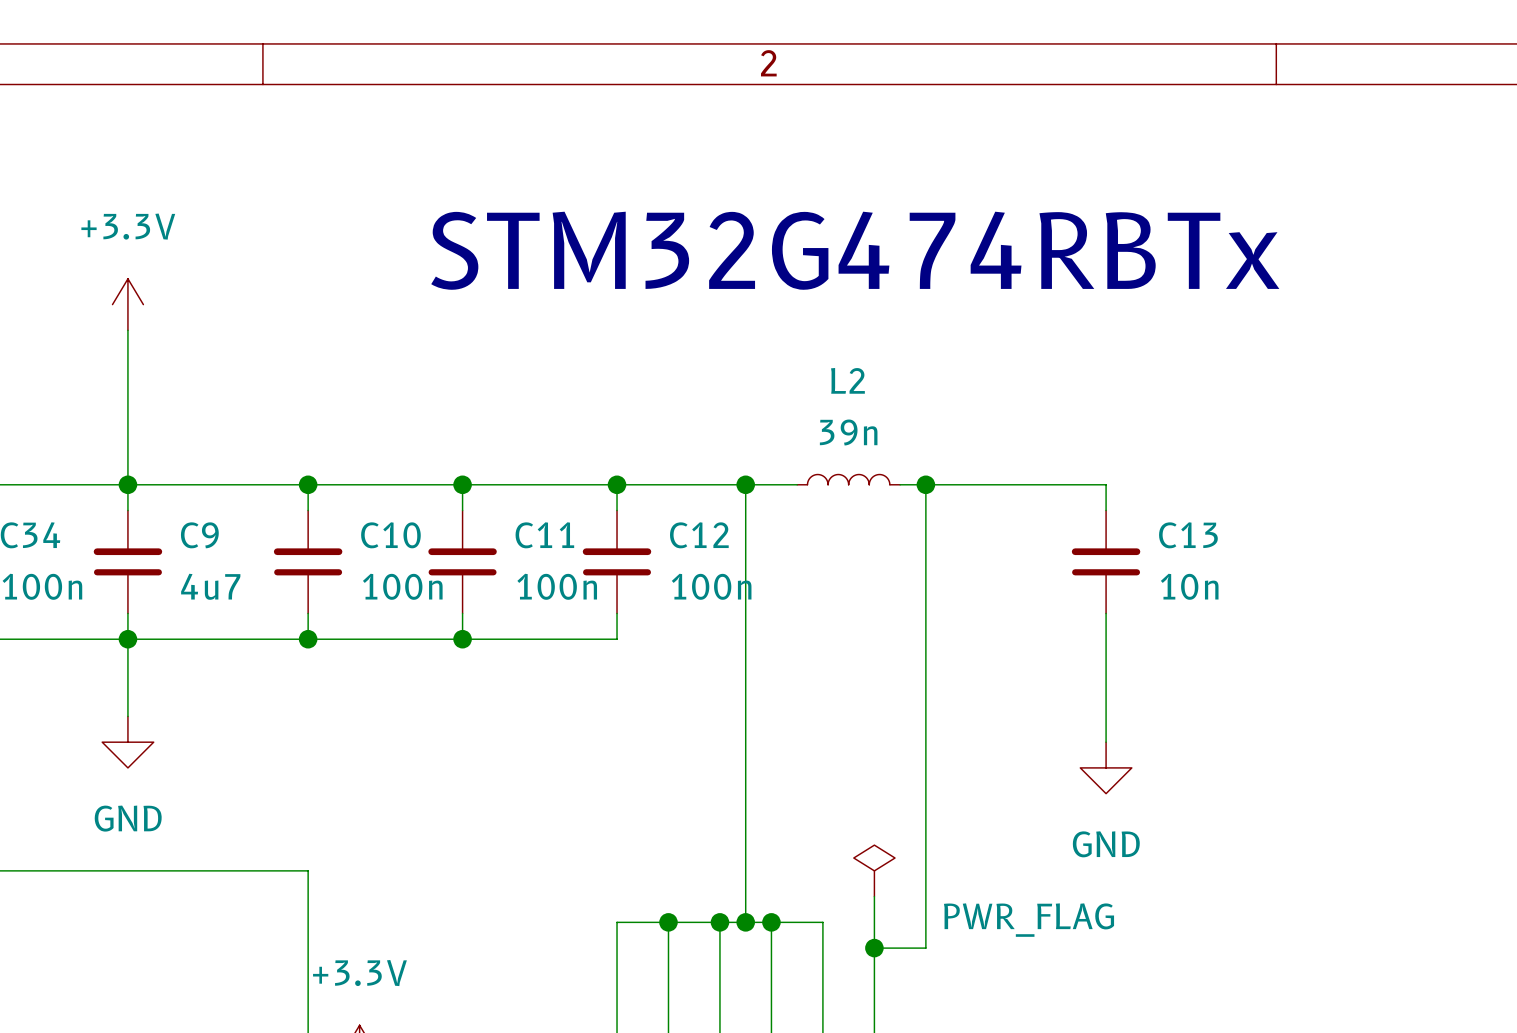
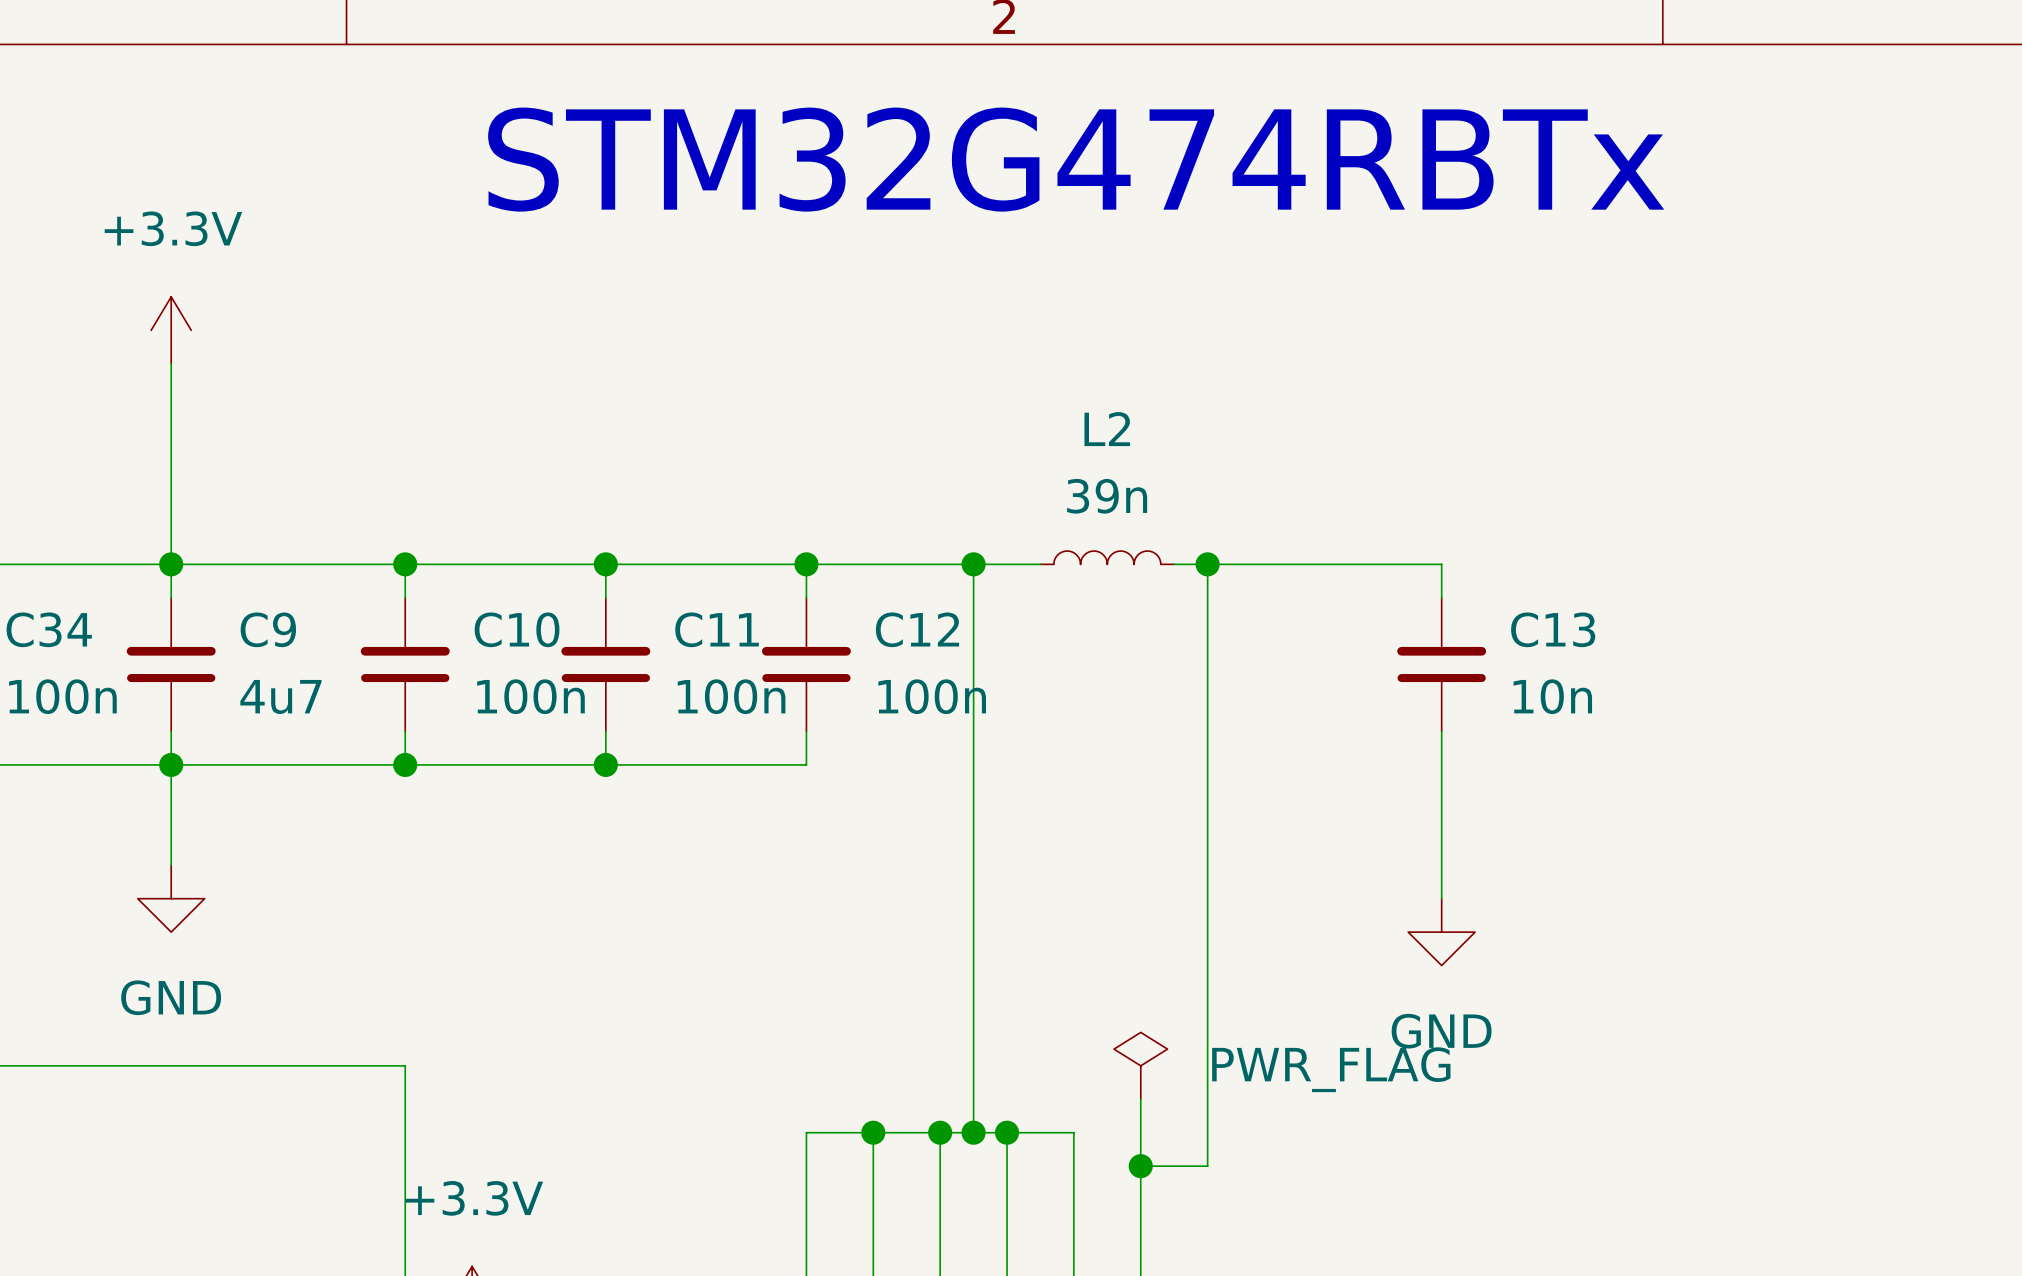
text position: STM32G474RBTx (855, 250) -> STM32G474RBTx (1076, 159)
power symbol text position: PWR_FLAG (1029, 920) -> PWR_FLAG (1331, 1069)

